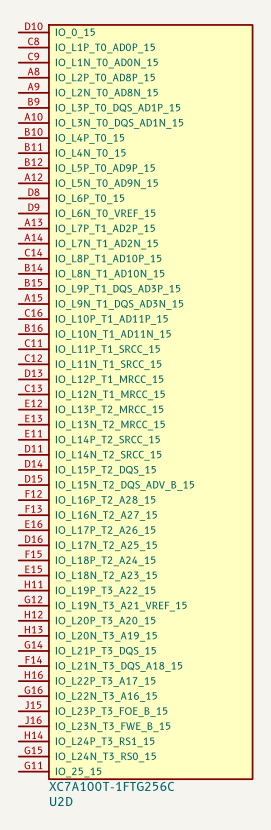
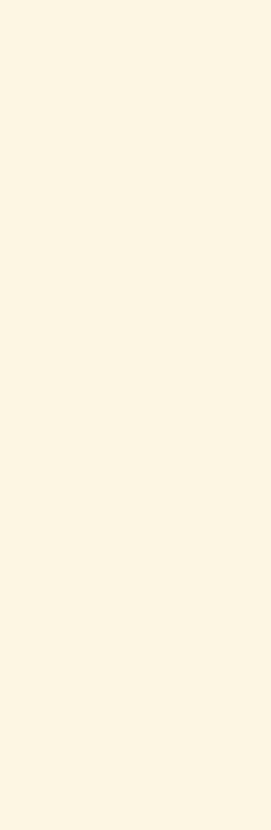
U2D: XC7A100T-1FTG256C (135, 402) -> none

